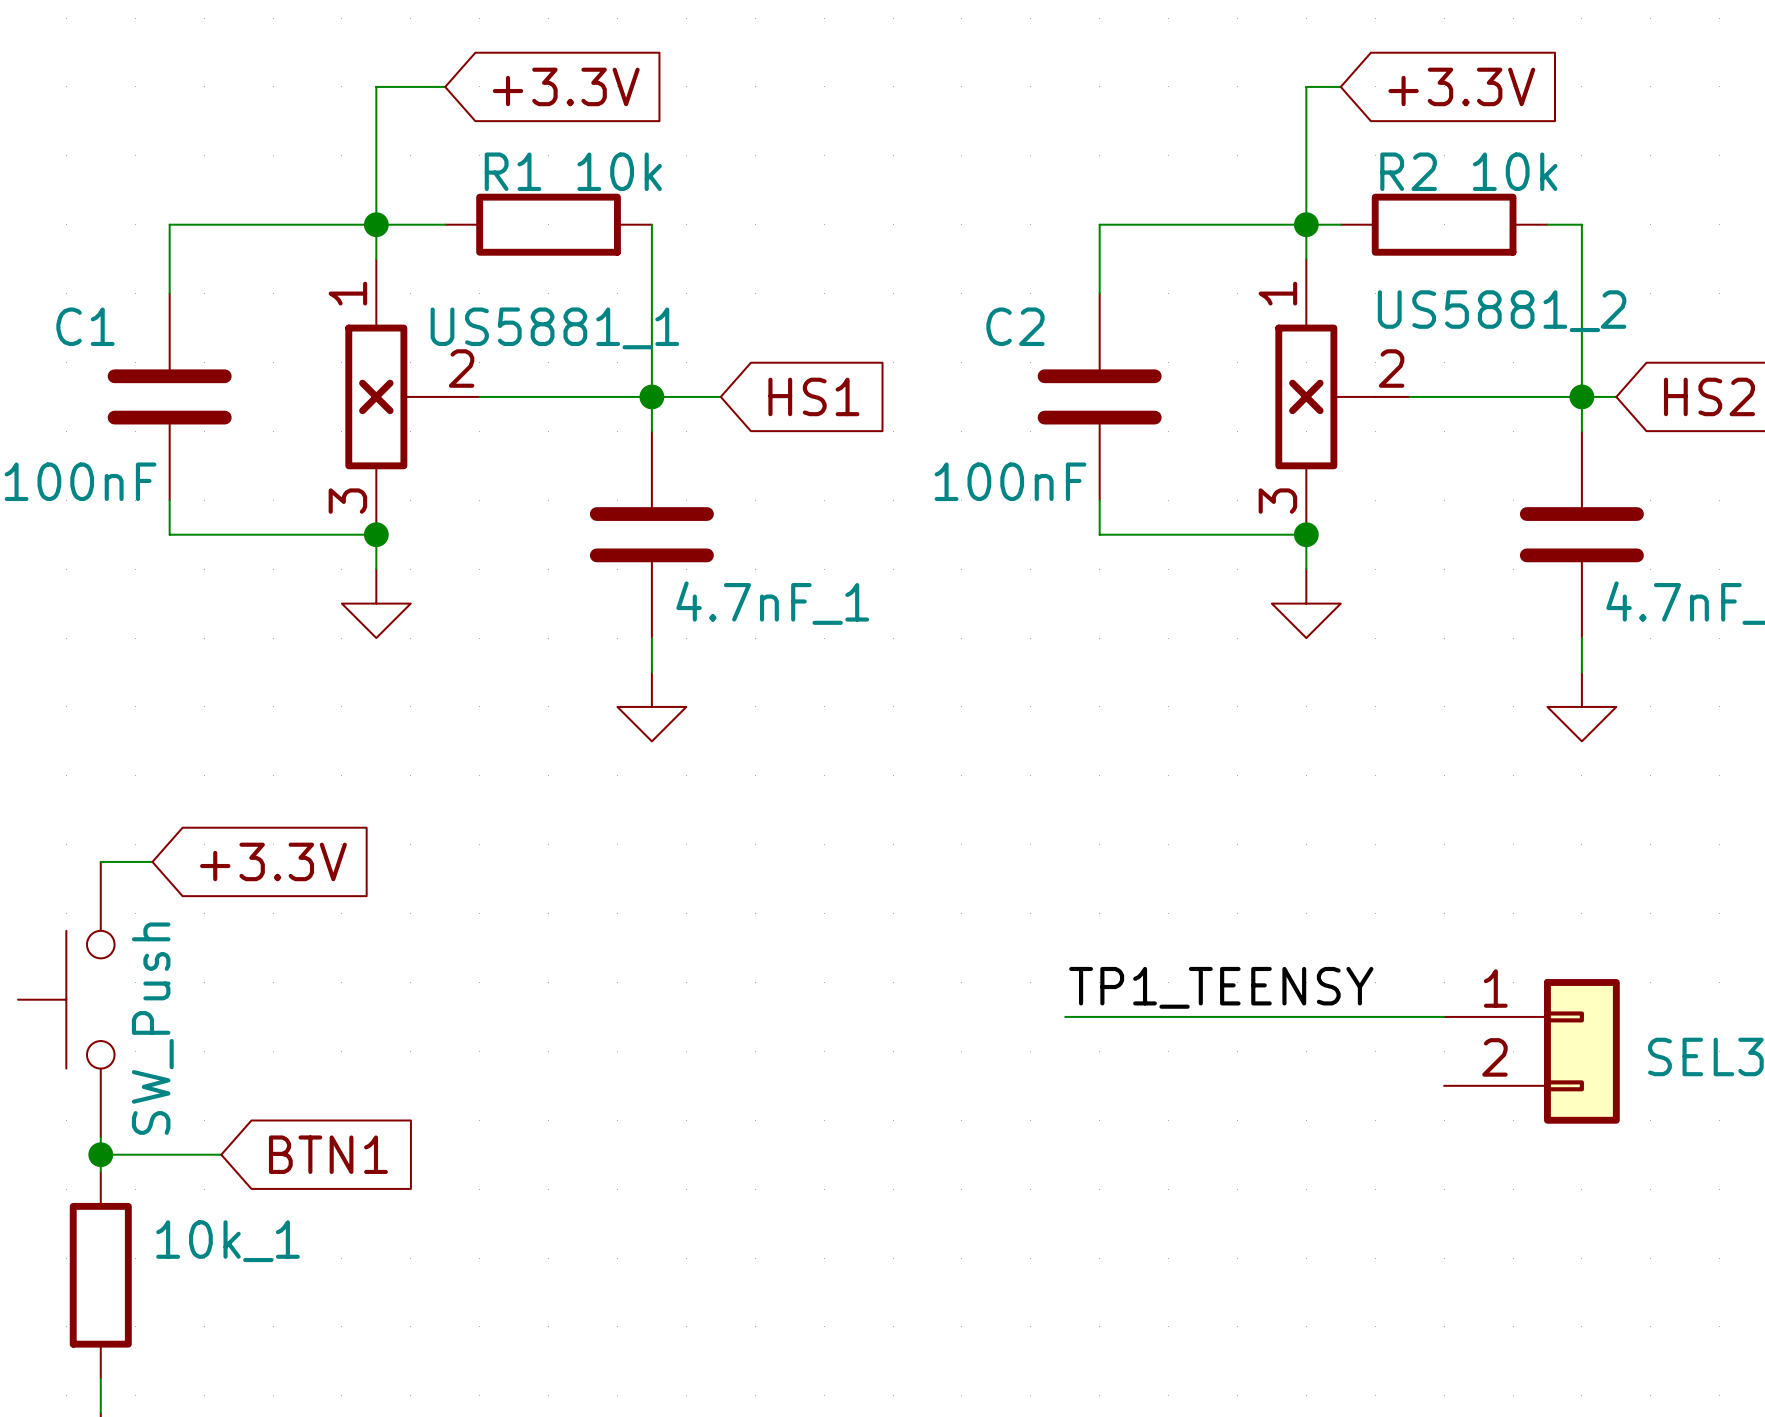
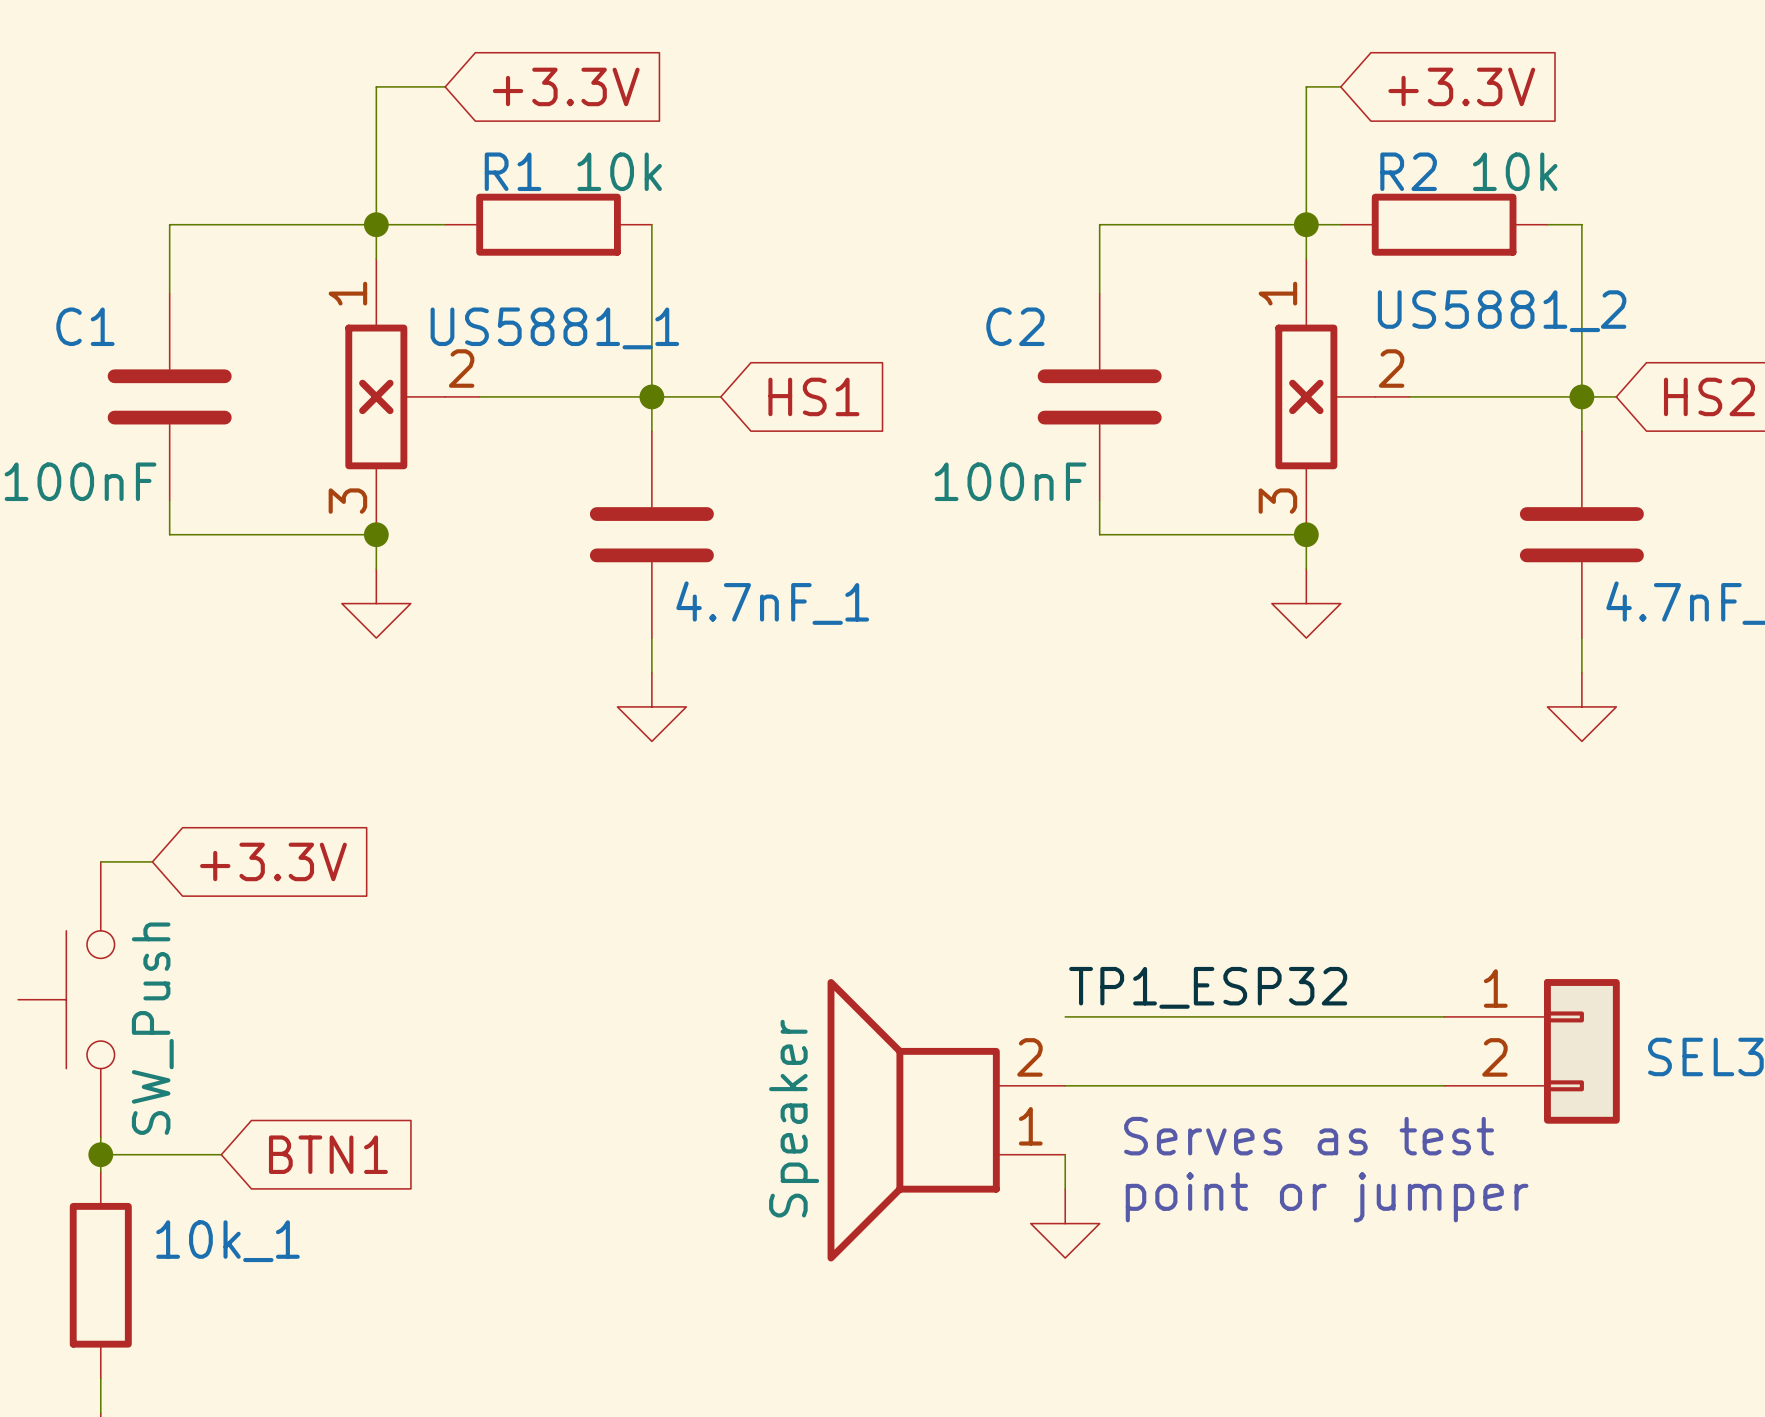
label: TP1_TEENSY (1221, 987) -> TP1_ESP32 (1208, 987)
wire: none -> (1065, 1085) (1444, 1085)
part: none -> Speaker (946, 1120)
text: none -> Serves as test (1309, 1136)
wire: none -> (1065, 1154) (1065, 1189)
text: none -> point or jumper (1327, 1197)
power symbol: none -> (1065, 1223)

